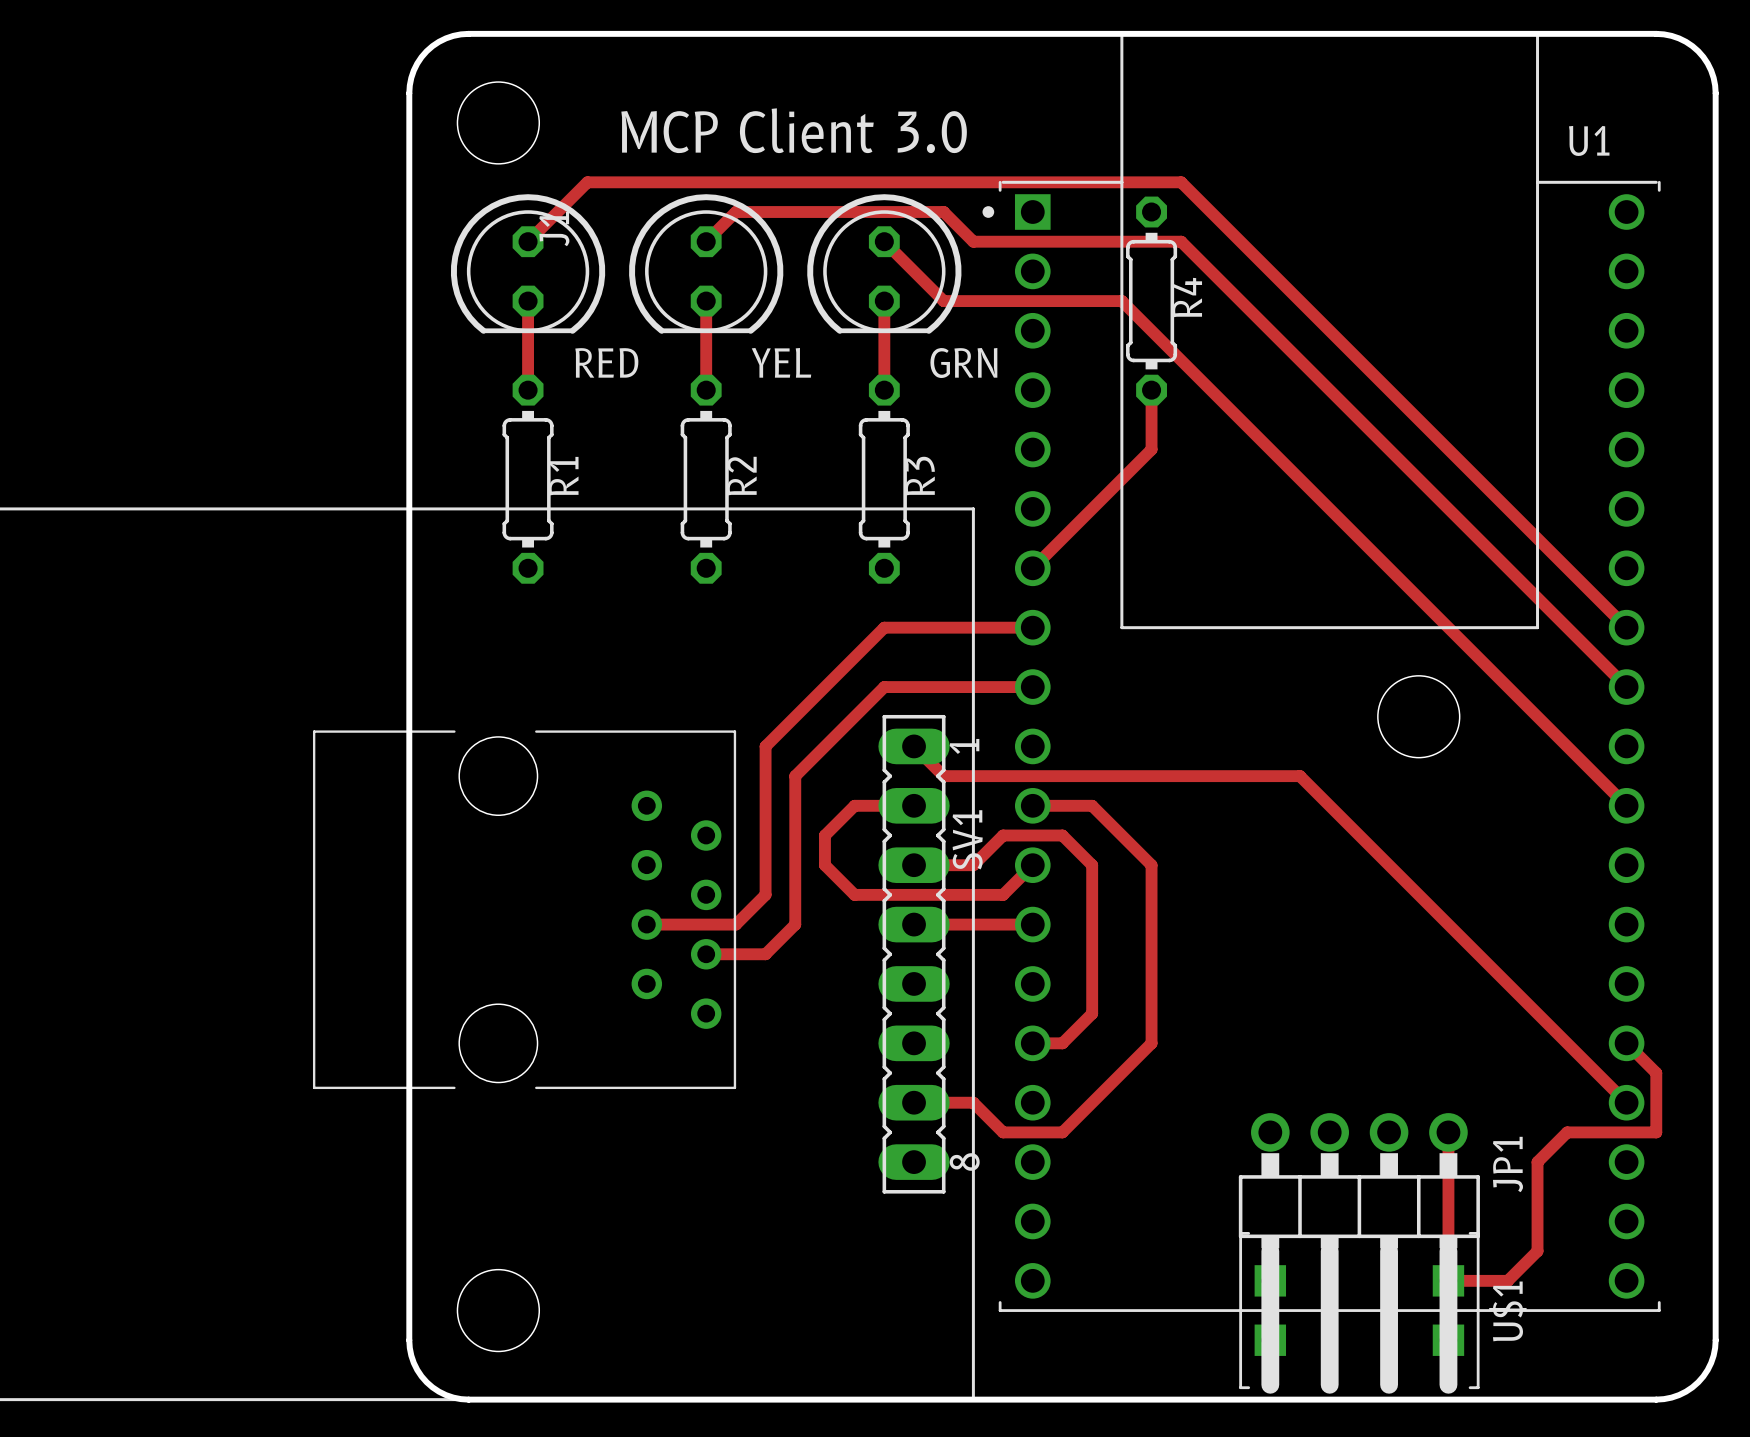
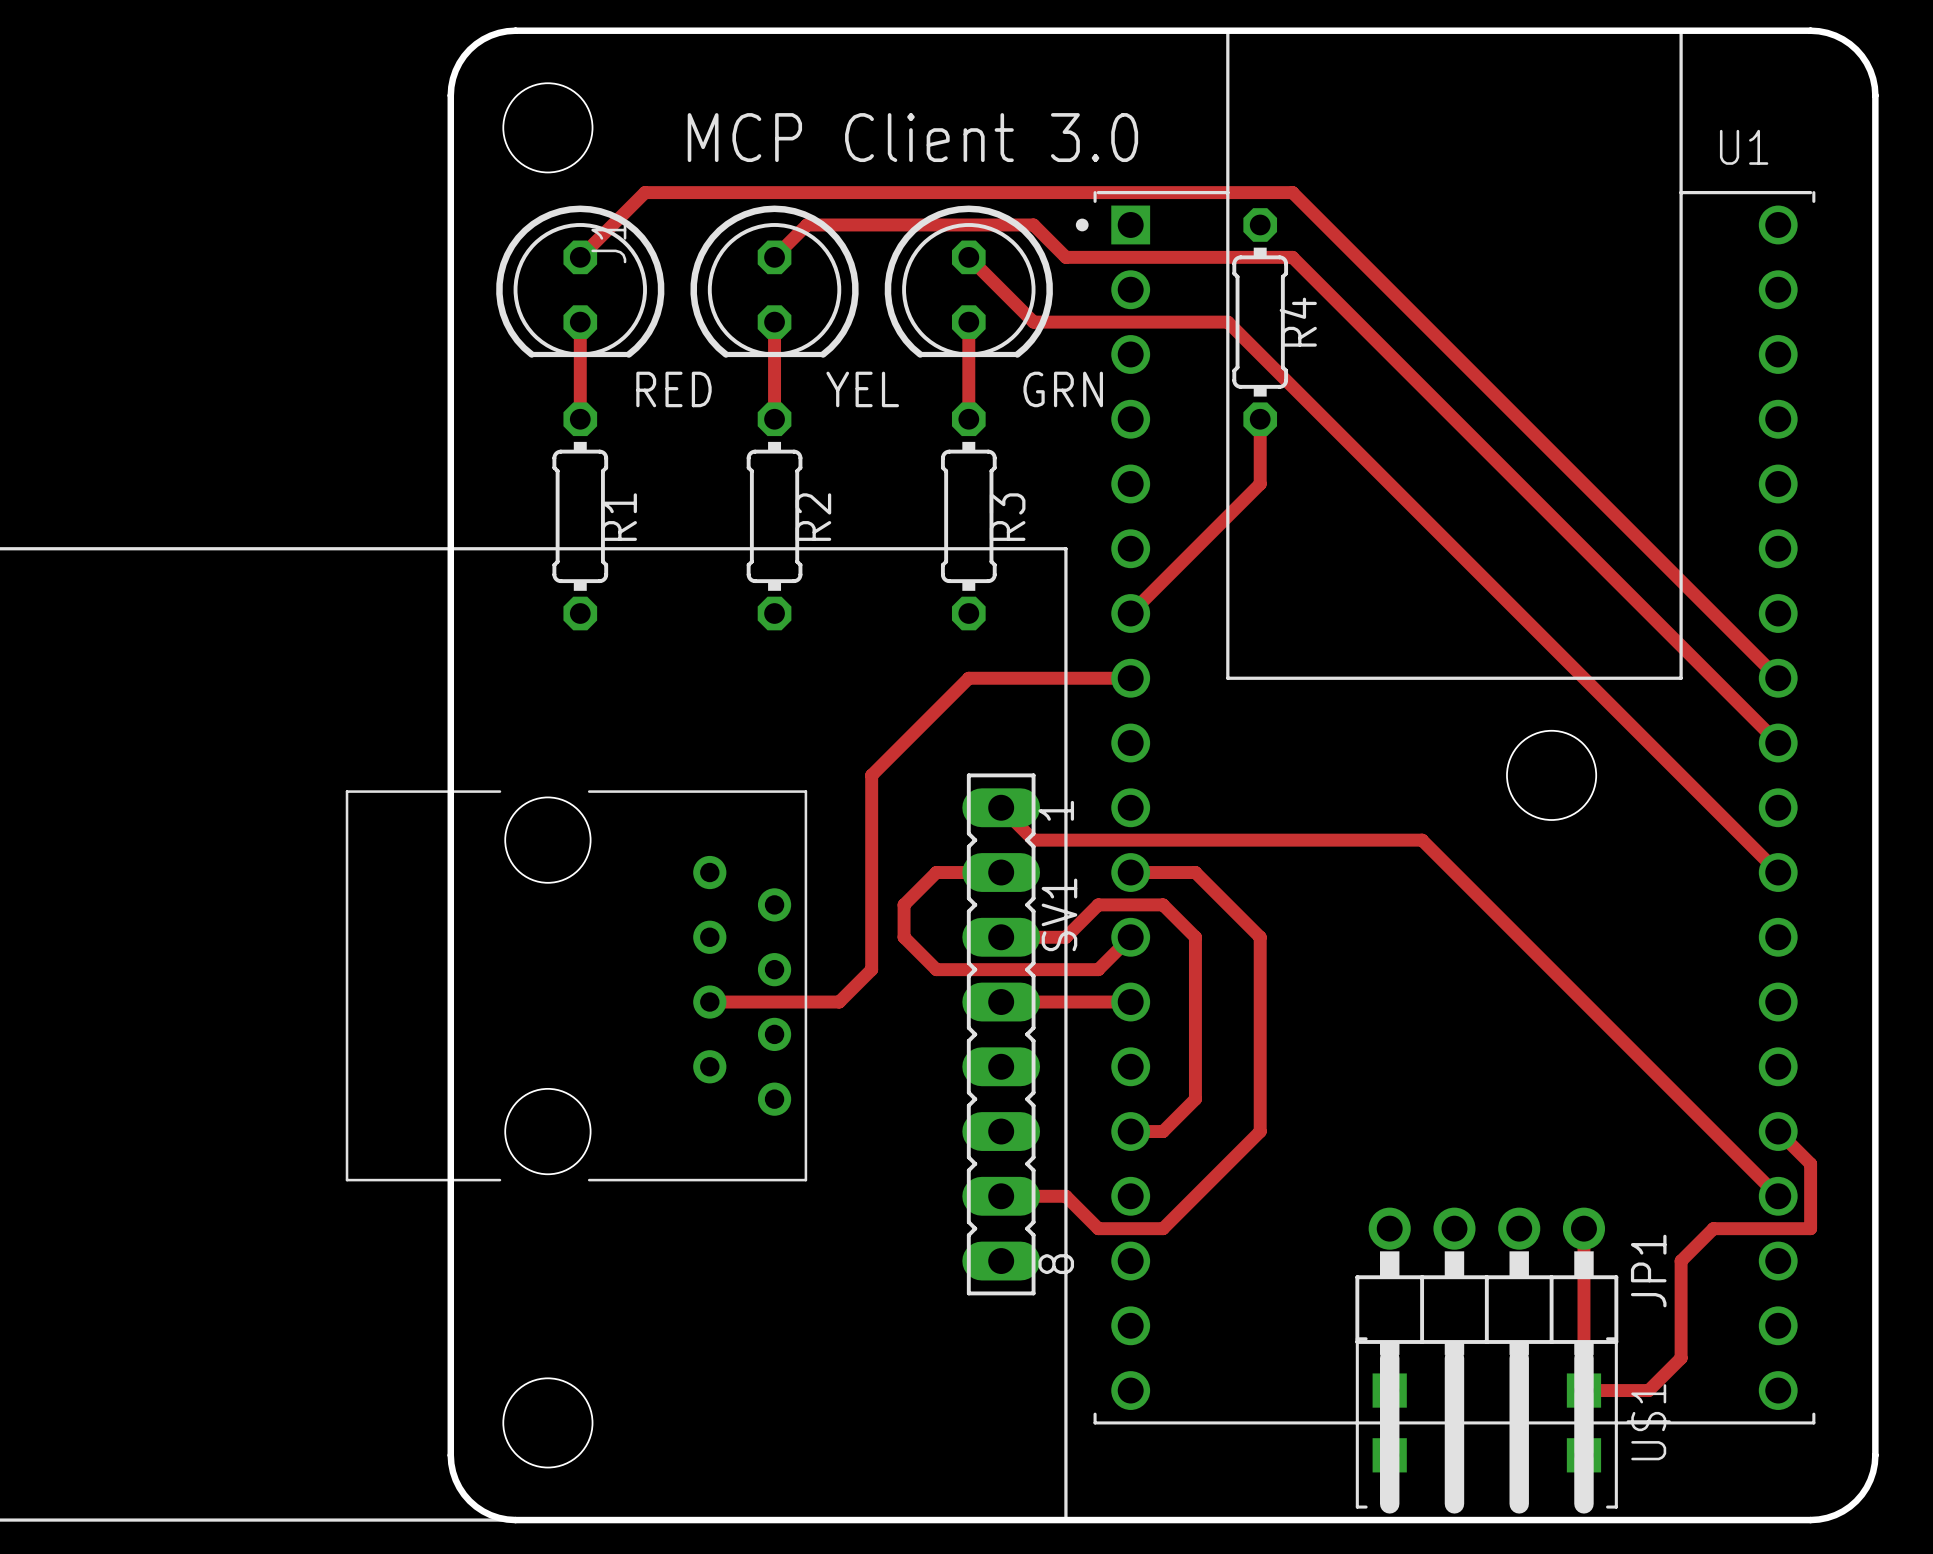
track: (1032, 687) (884, 687) (795, 776) -> none
track: (795, 716) (765, 746) (765, 894) (735, 924) -> (871, 775) (871, 840)
track: (795, 894) (795, 924) (765, 954) (706, 954) -> (871, 969) (839, 1002) (806, 1002)

